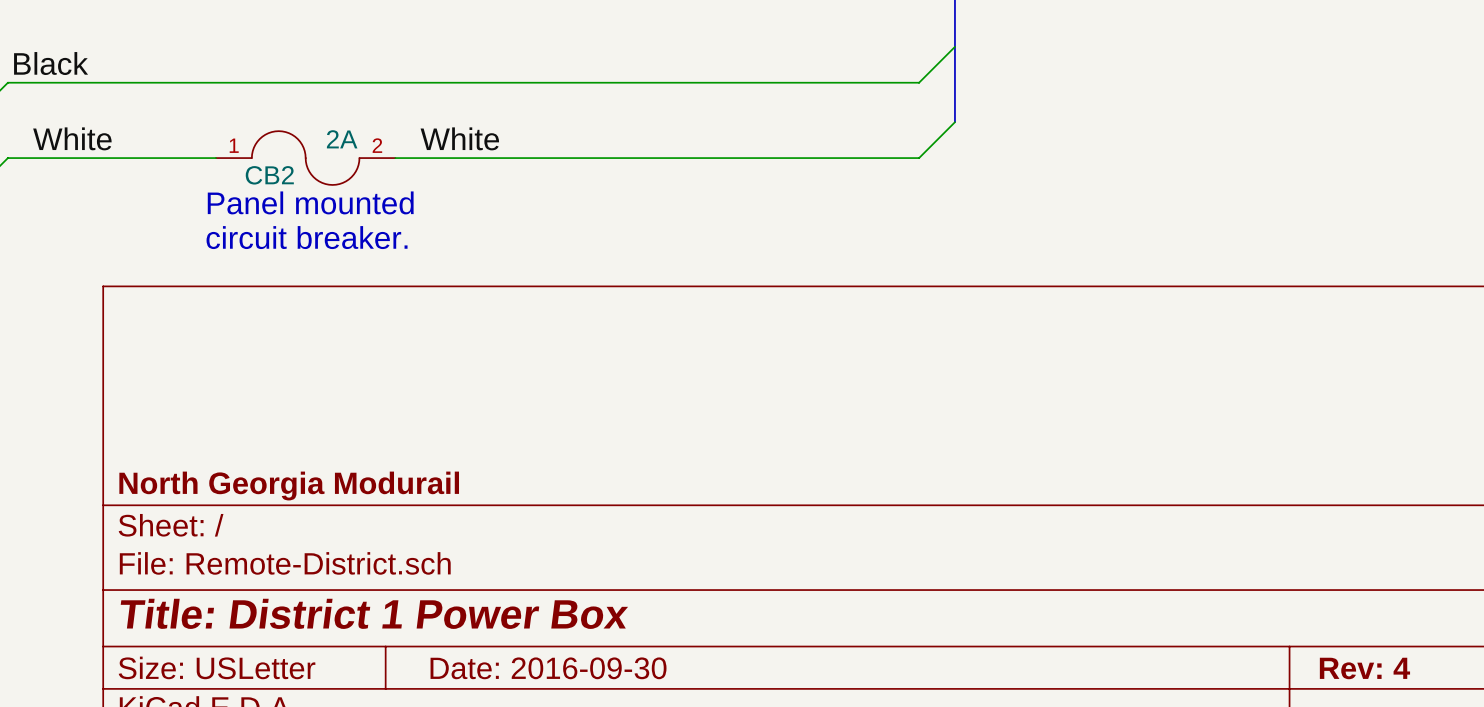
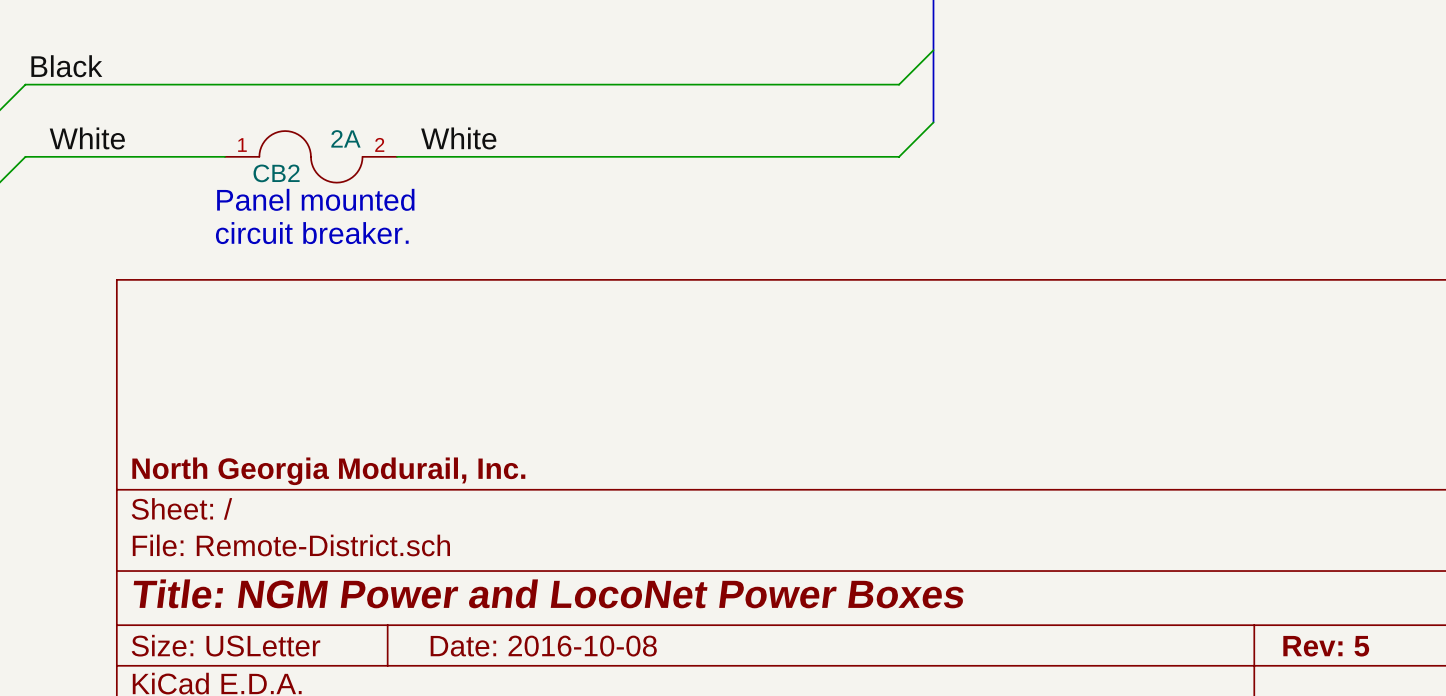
title block: North Georgia Modurail (289, 486) -> North Georgia Modurail, Inc. (328, 471)
title block: Title: District 1 Power Box (374, 613) -> Title: NGM Power and LocoNet Power Boxes (548, 593)
title block: Date: 2016-09-30 (548, 668) -> Date: 2016-10-08 (543, 646)
title block: Rev: 4 (1364, 668) -> Rev: 5 (1326, 646)

